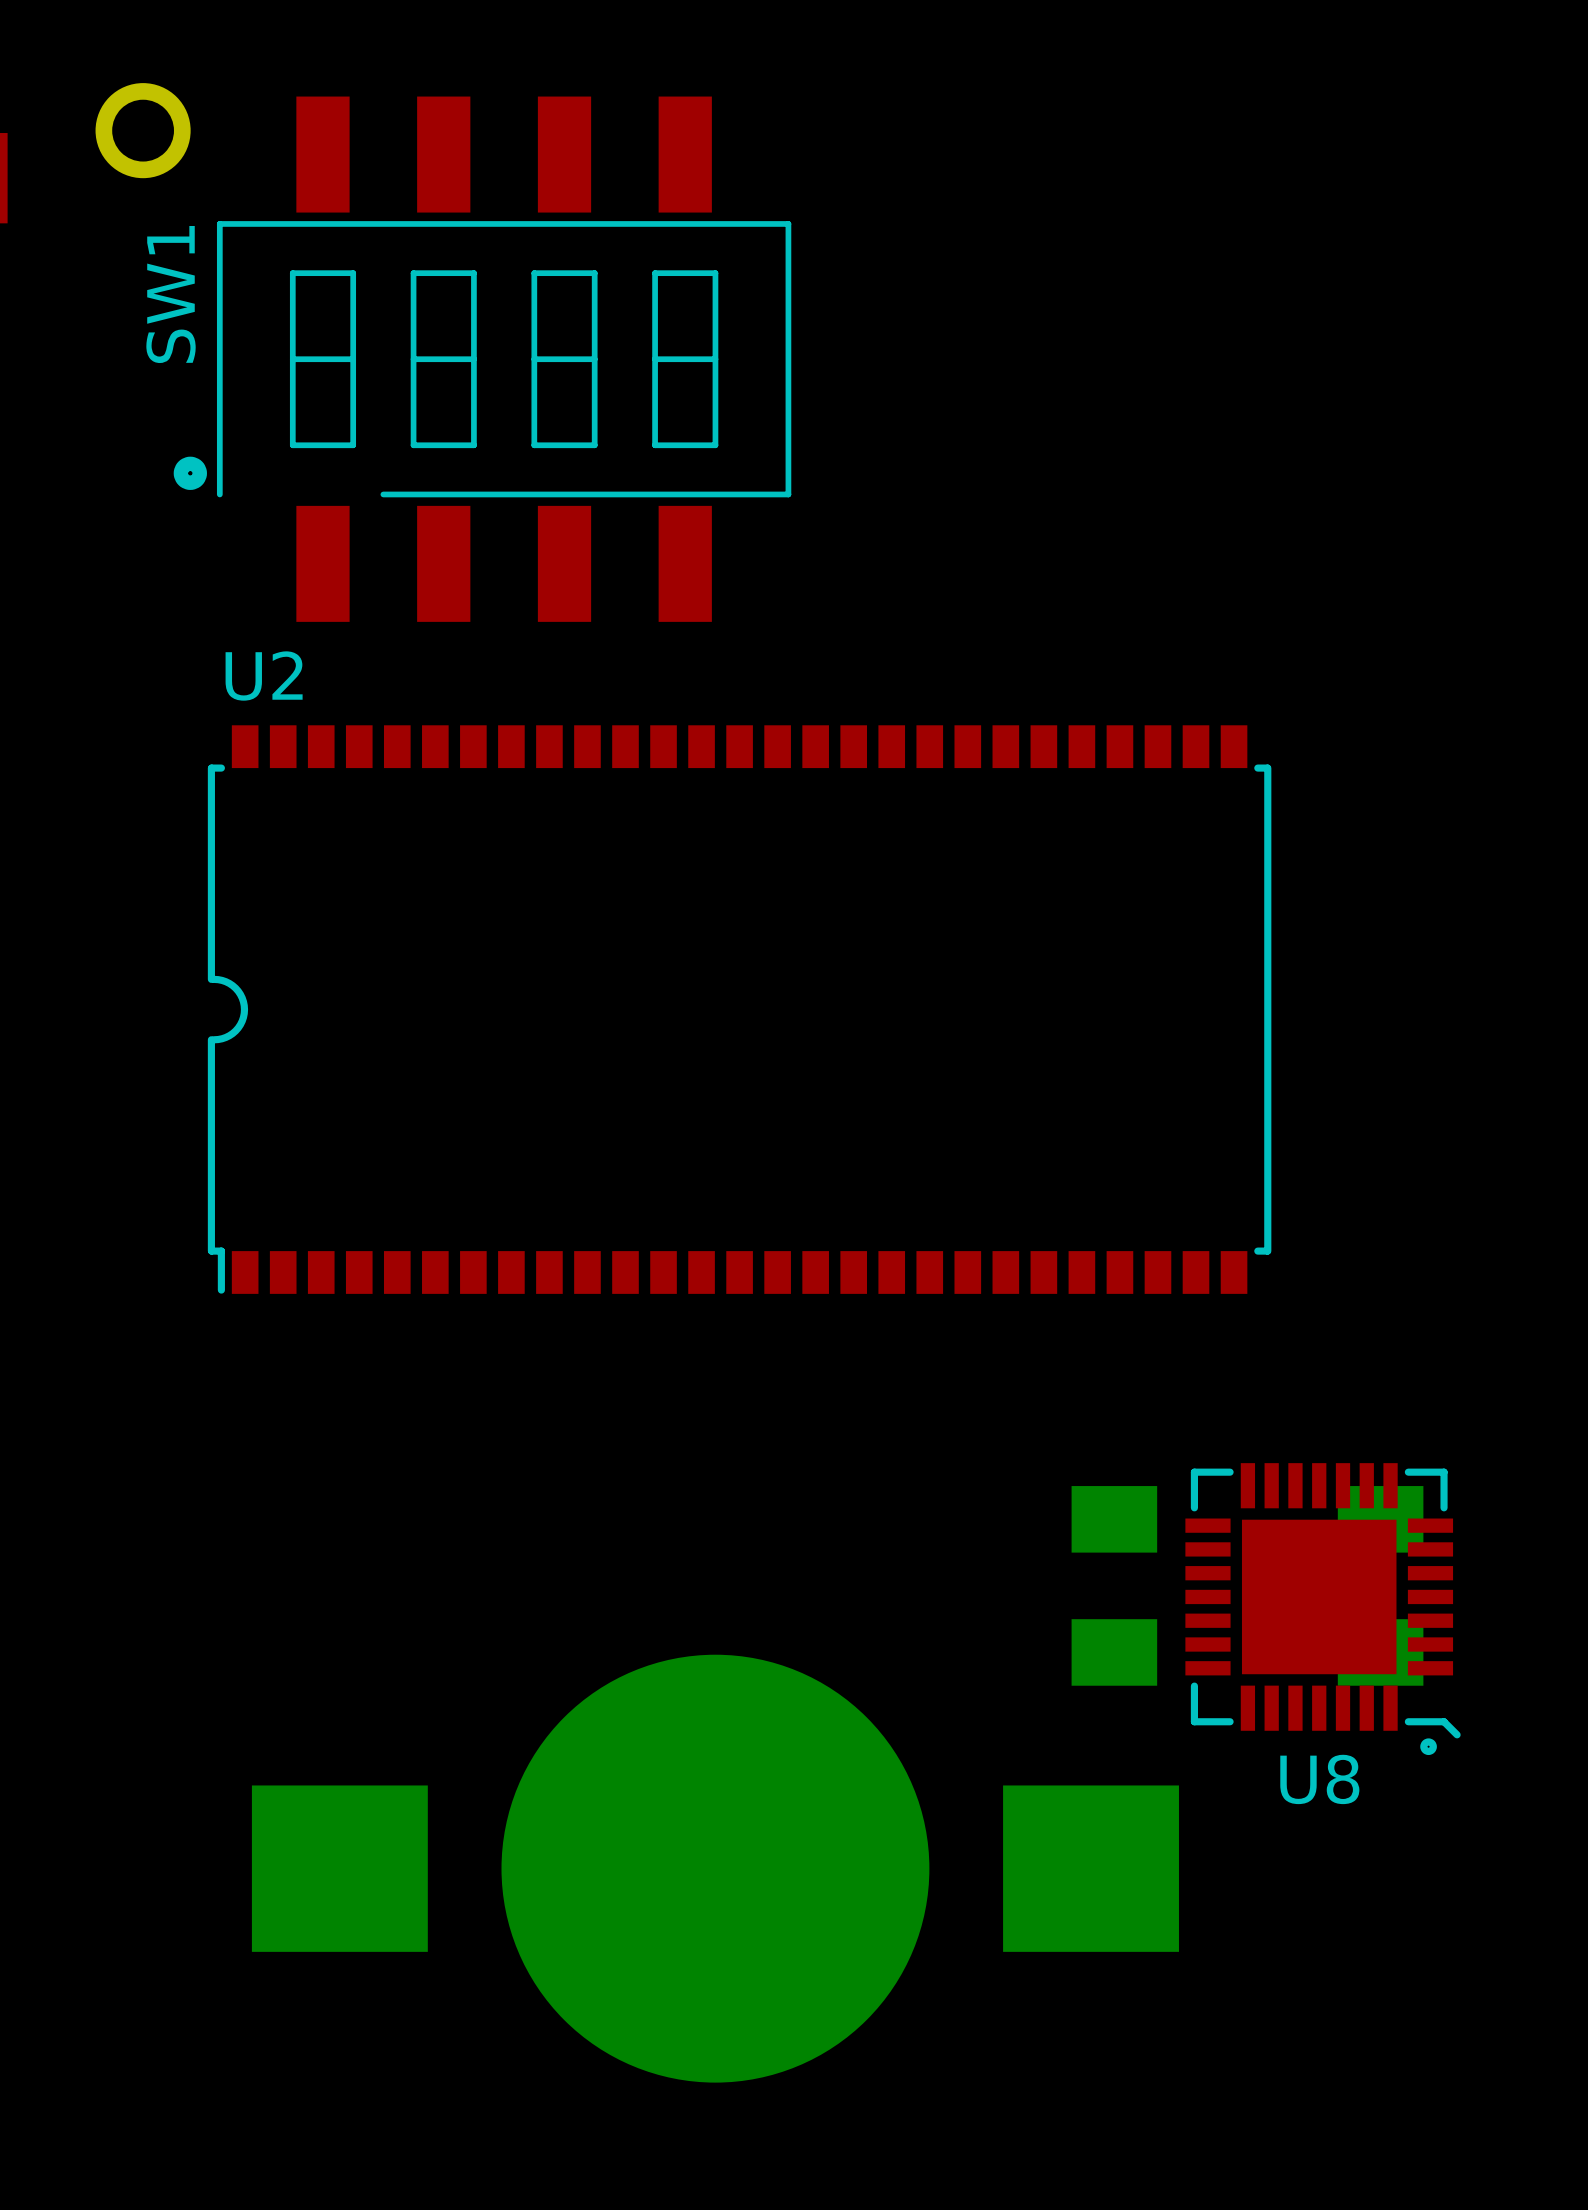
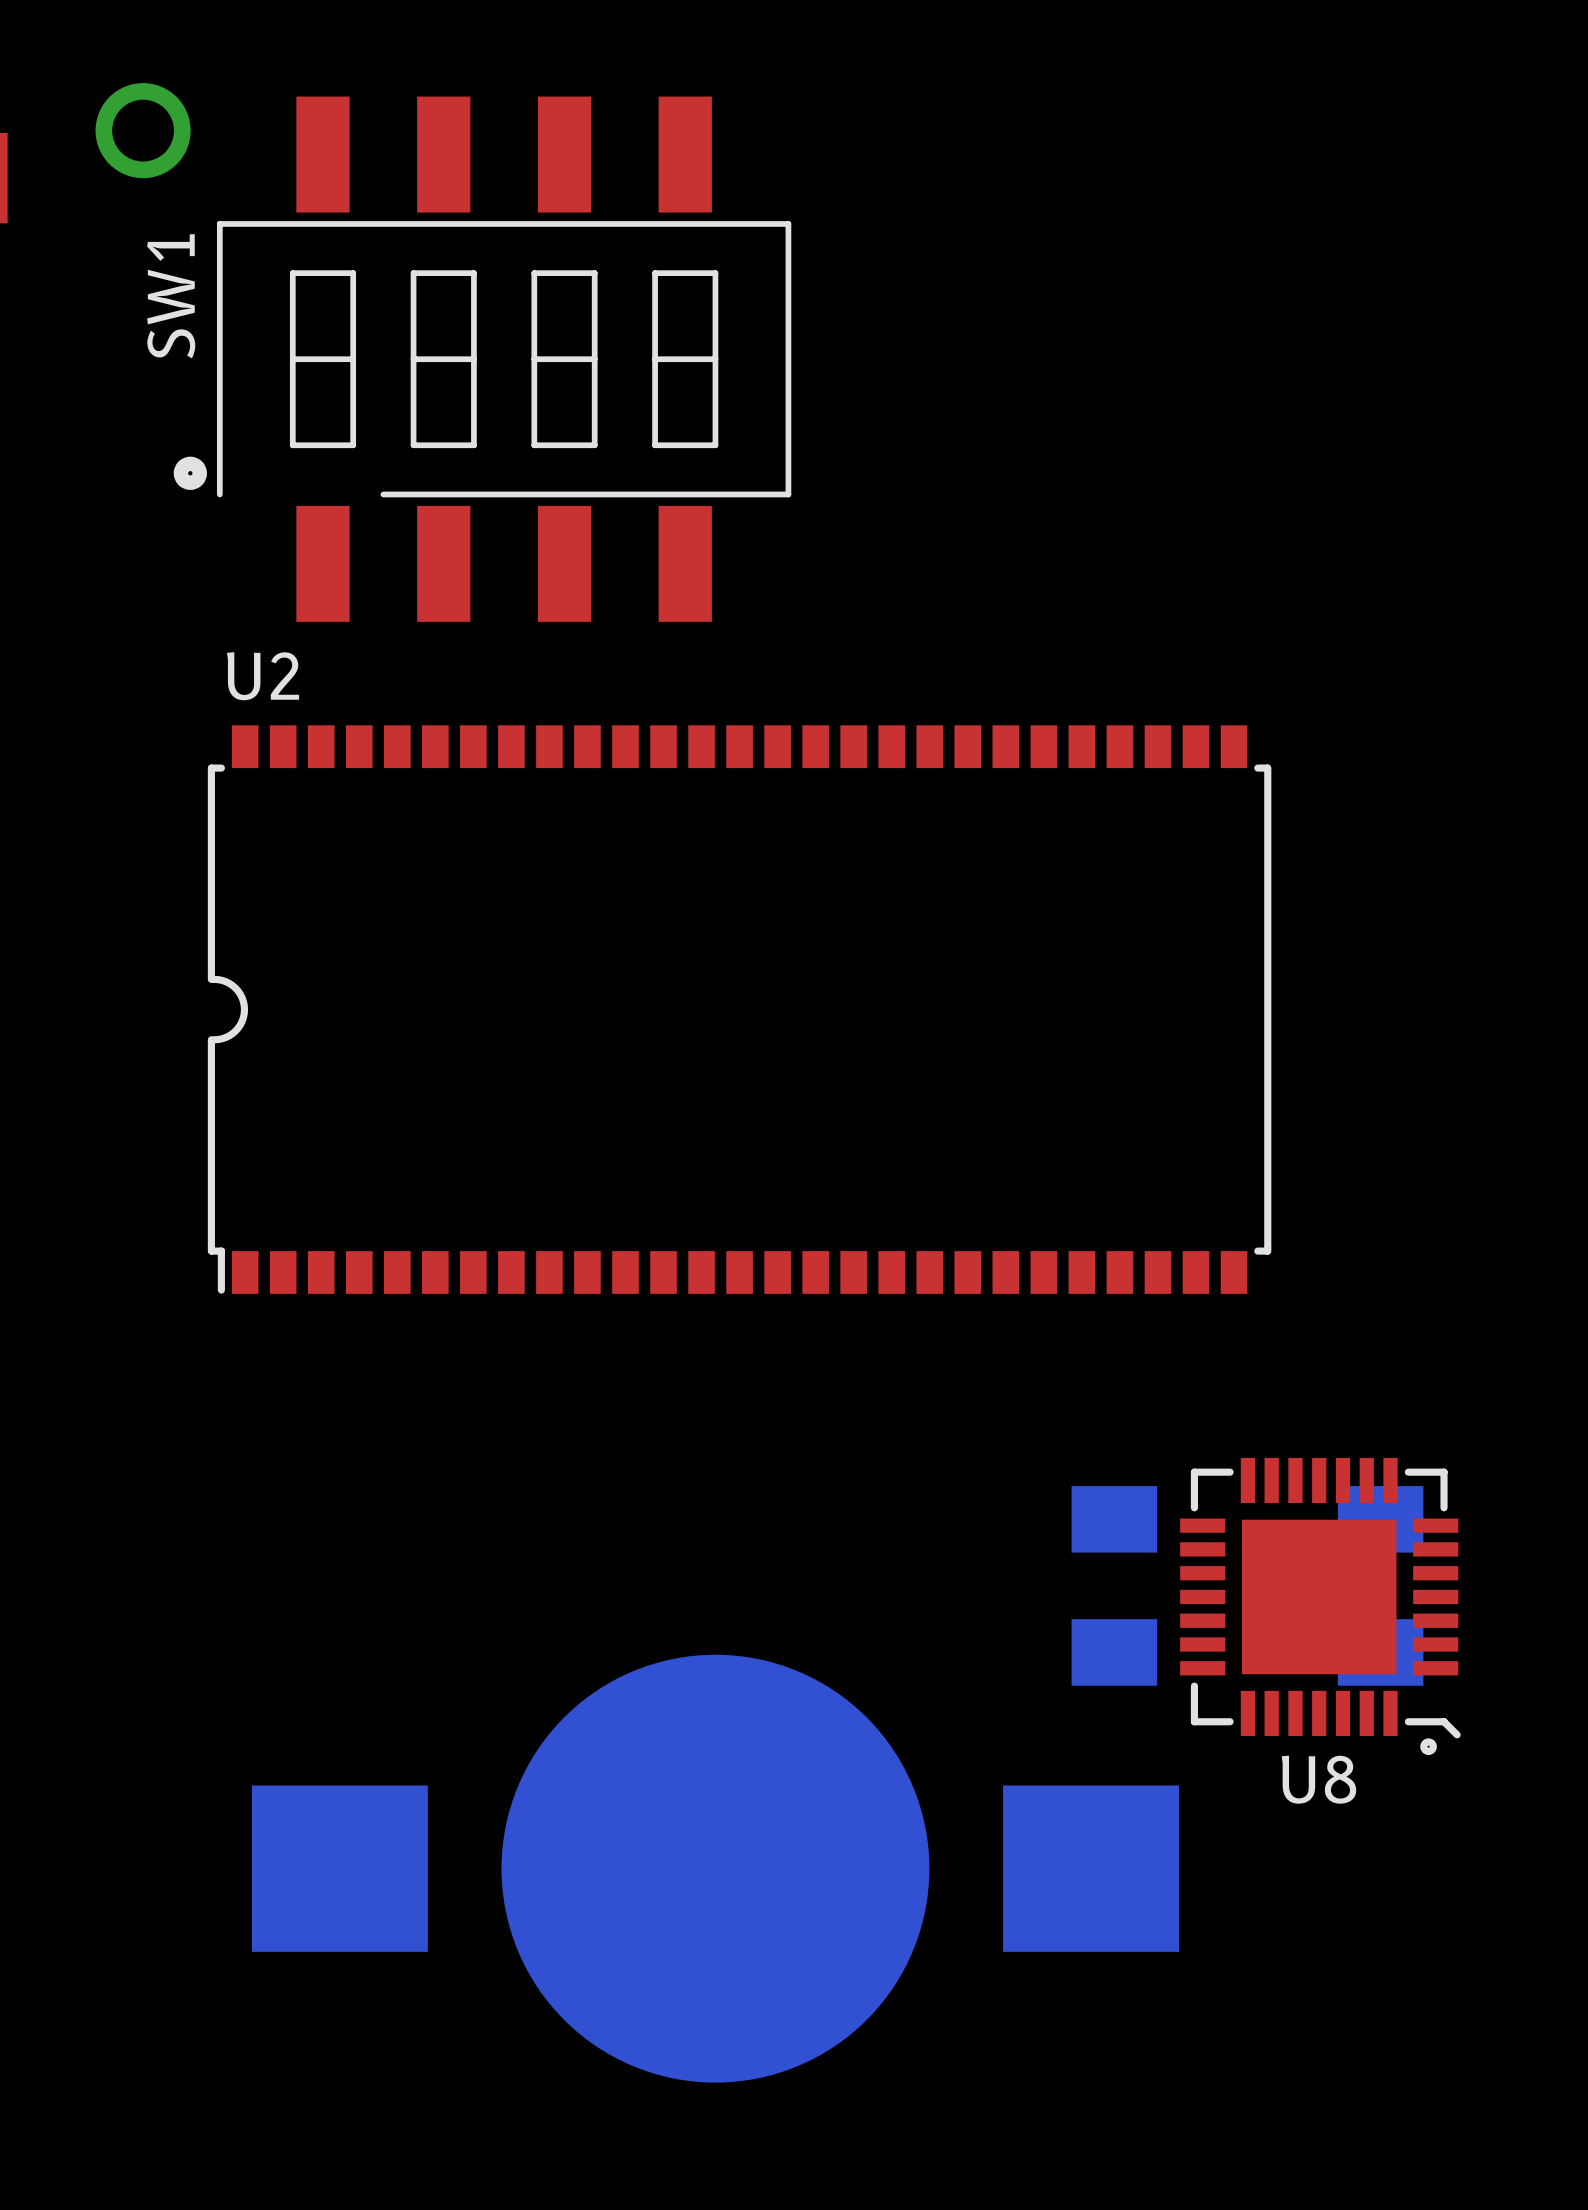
U8 footprint: [1185, 1463, 1461, 1756] -> [1180, 1457, 1461, 1756]

